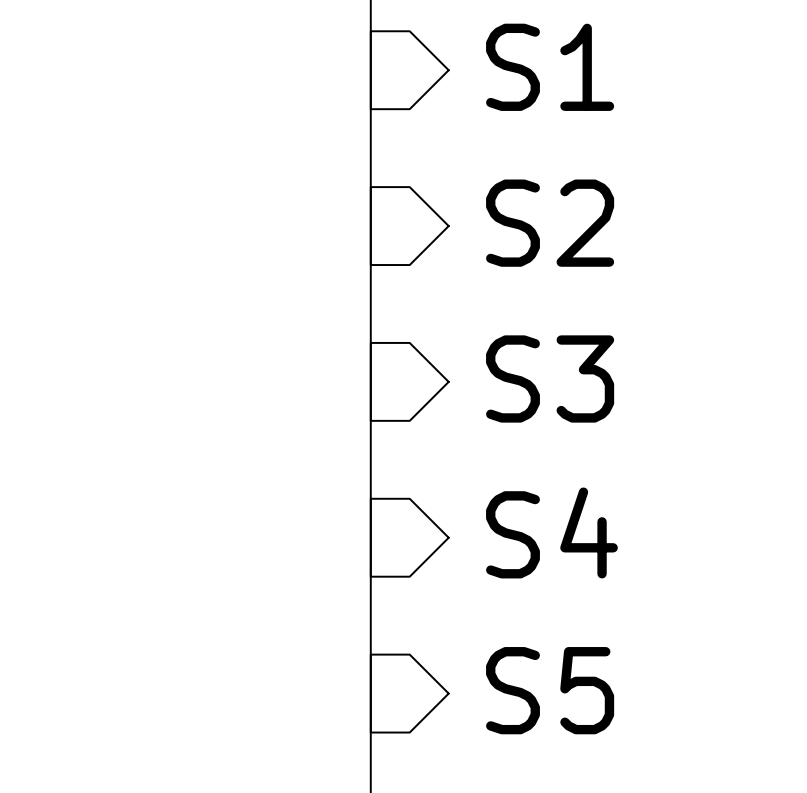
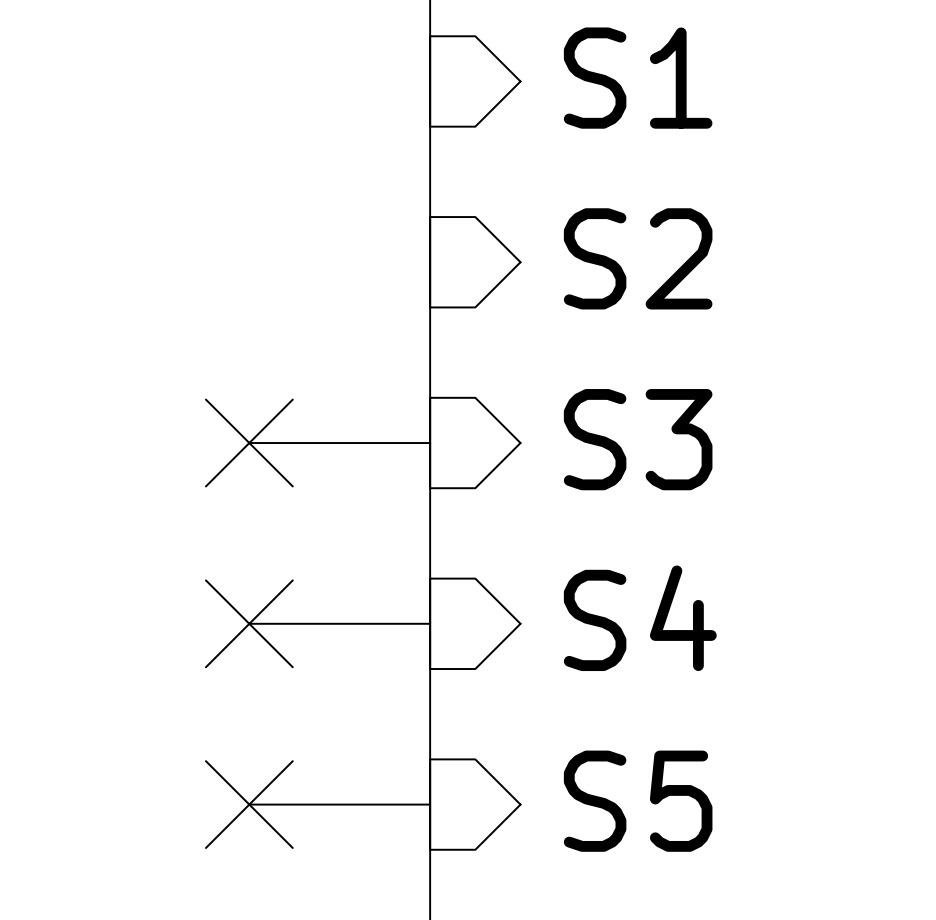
wire: none -> (249, 443) (430, 443)
no-connect mark: none -> (249, 443)
wire: none -> (249, 623) (430, 623)
no-connect mark: none -> (249, 623)
wire: none -> (249, 804) (430, 804)
no-connect mark: none -> (249, 804)

